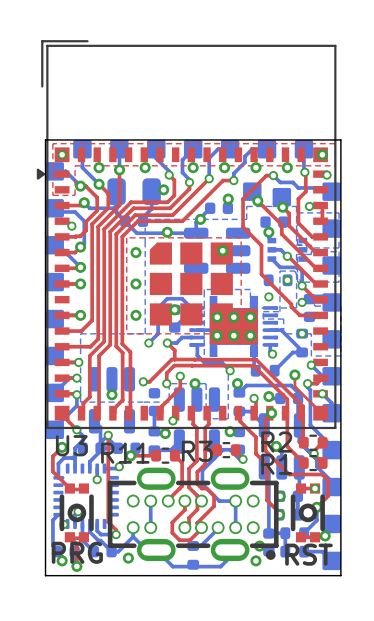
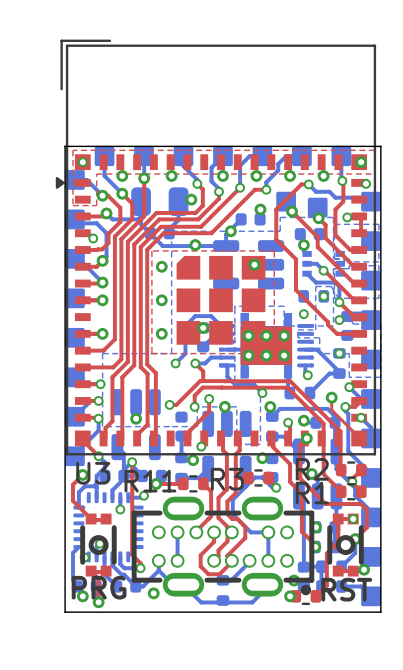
top track: none -> (338, 518) (338, 542) (326, 553) (326, 585) (315, 596)
part: none -> (305, 596)

